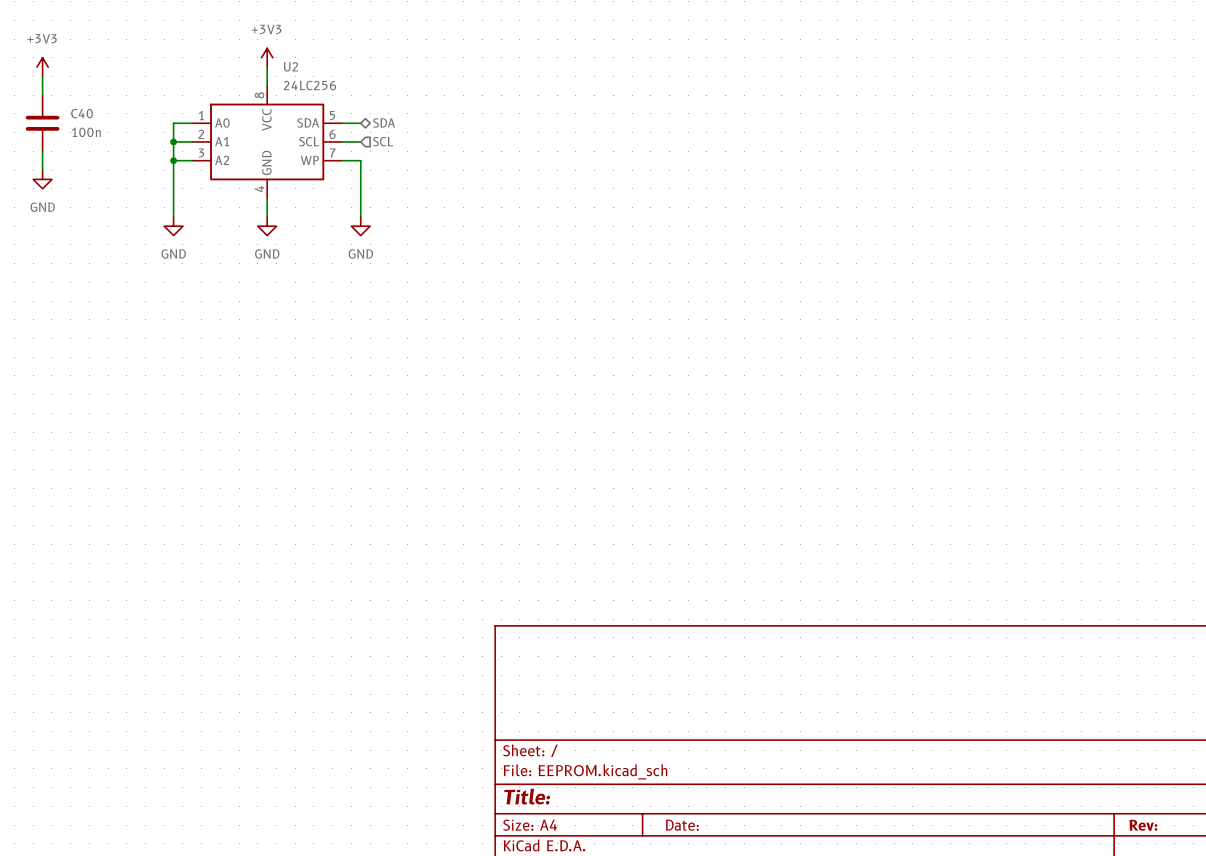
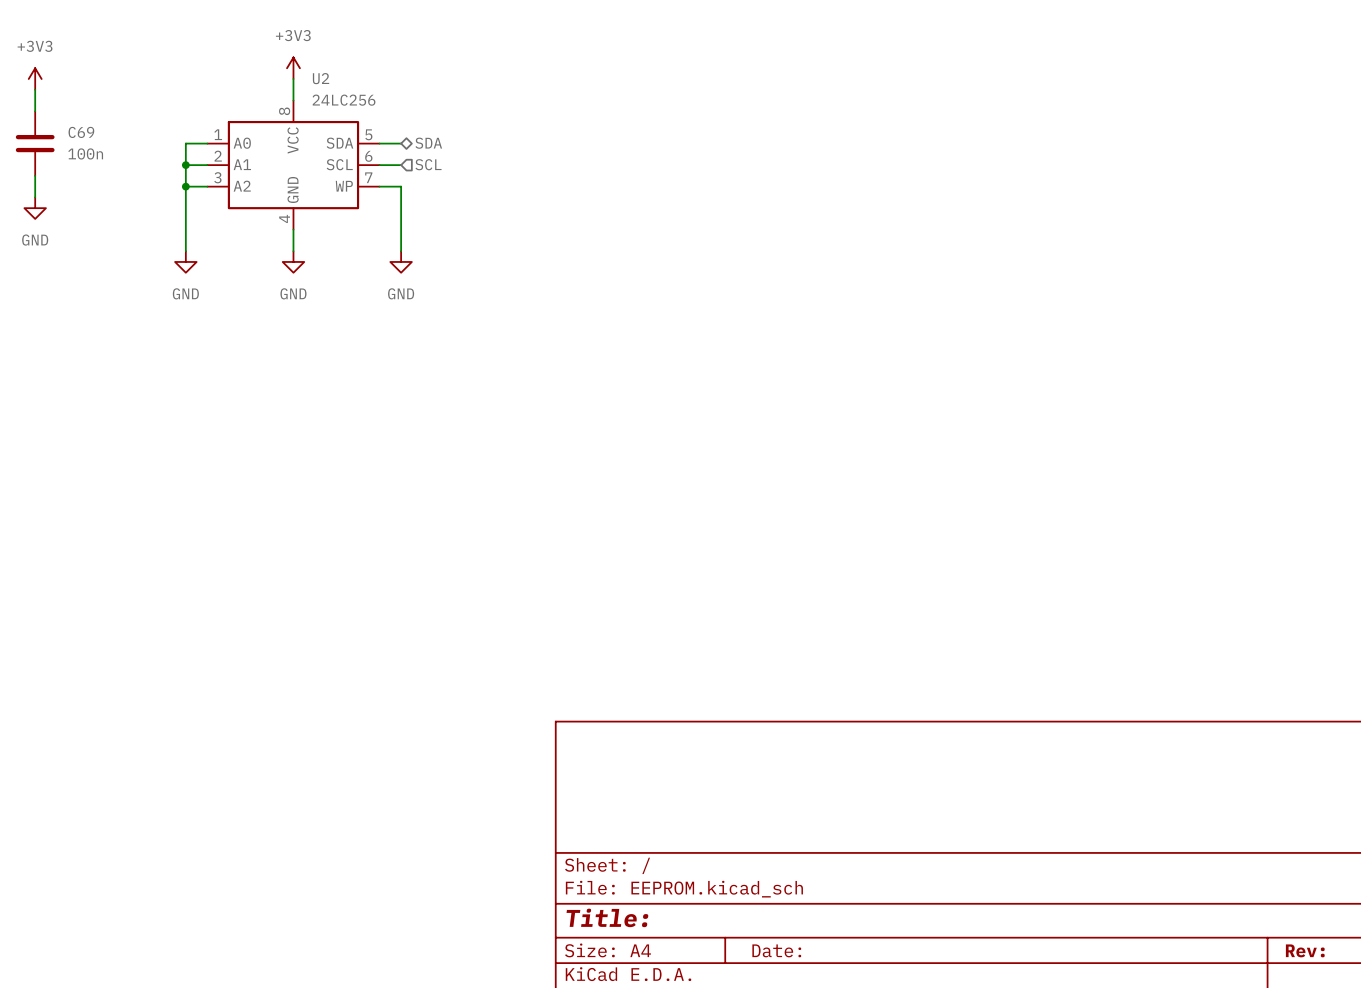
C40 name: C40 (82, 113) -> C69 (81, 132)

